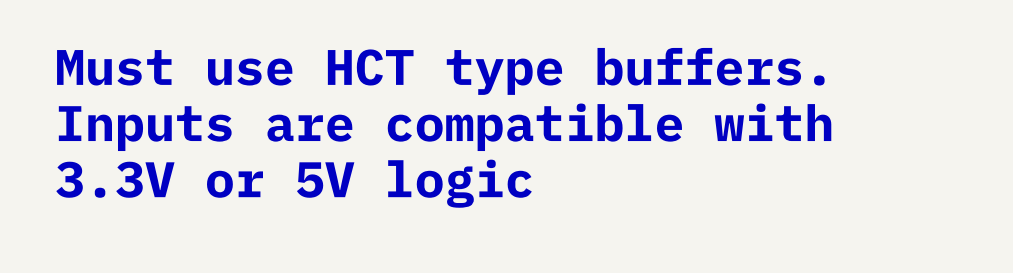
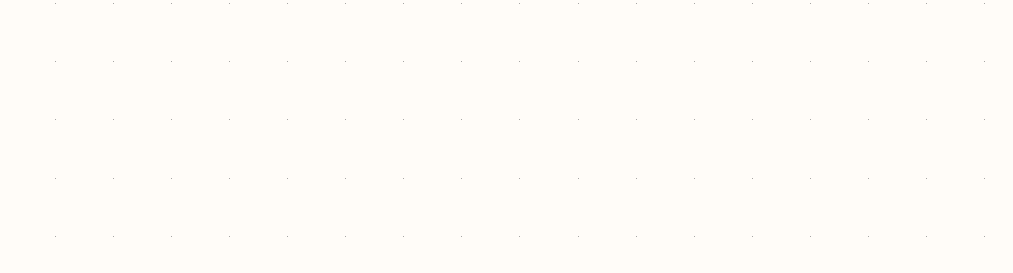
text: Must use HCT type buffers. (440, 71) -> none
text: Inputs are compatible with (445, 127) -> none
text: 3.3V or 5V logic (294, 183) -> none

